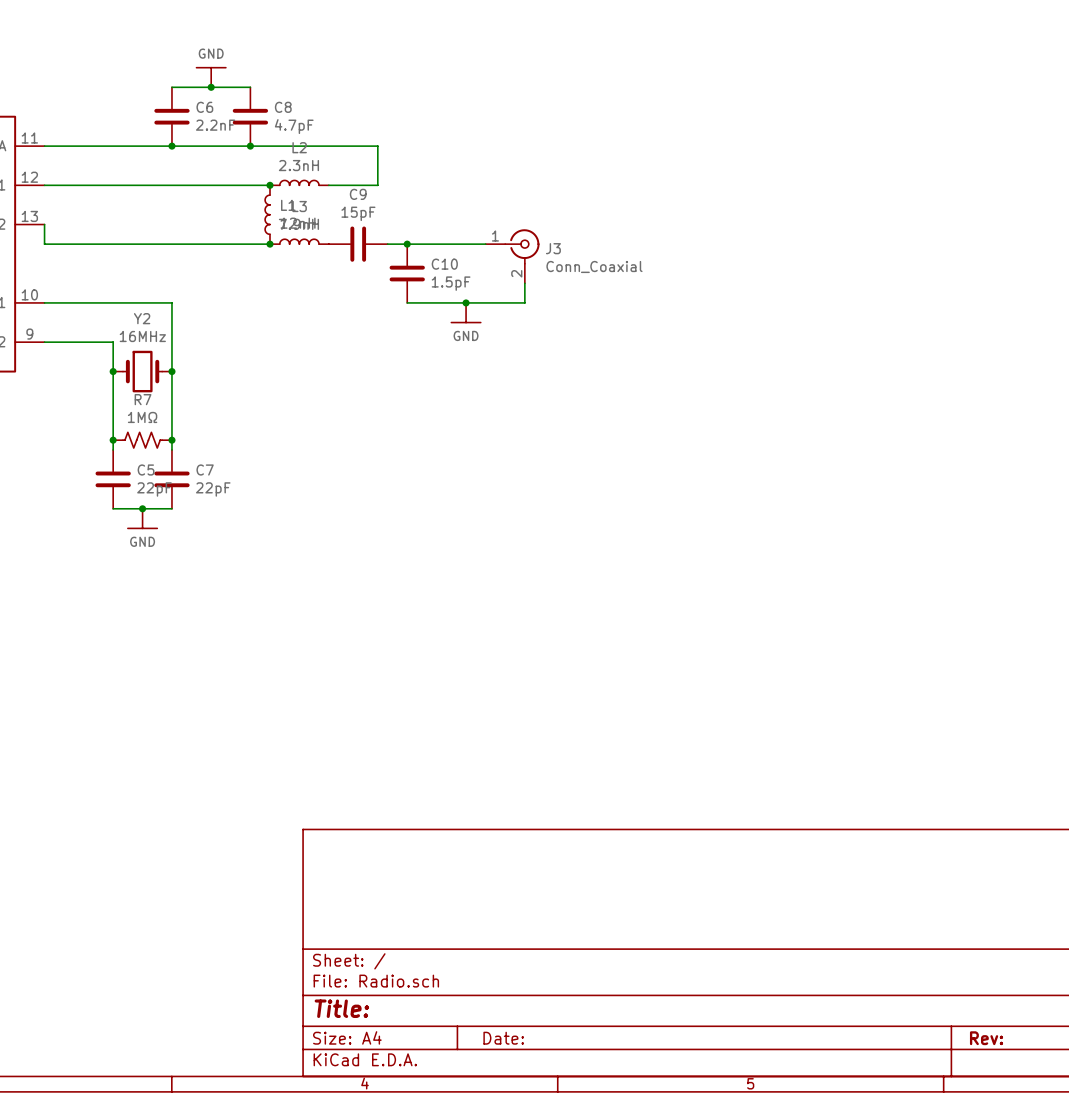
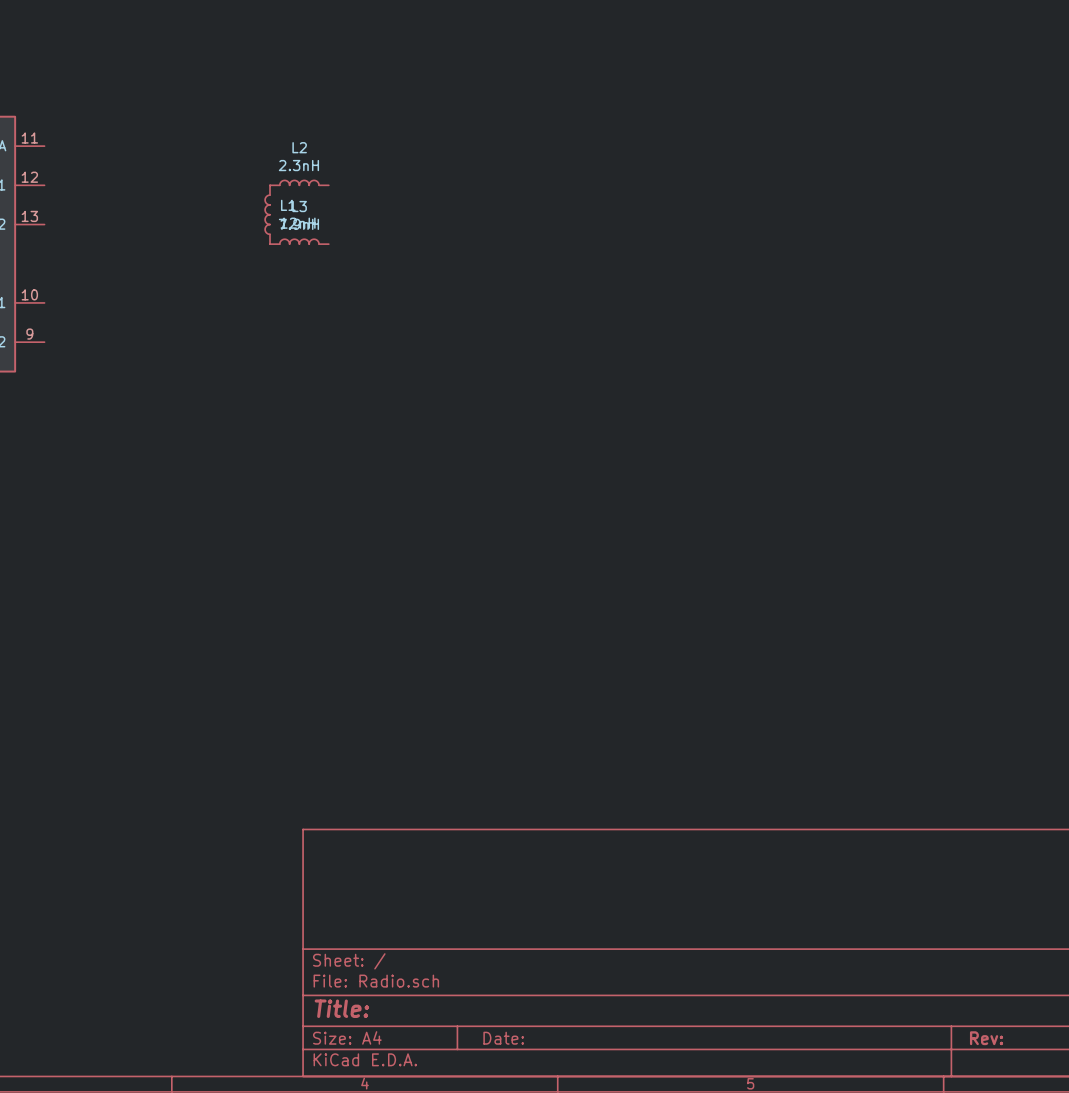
power symbol: GND (211, 77) -> none
wire: (171, 87) (250, 87) -> none
junction: (211, 87) -> none
C6: 2.2nF (171, 116) -> none
C8: 4.7pF (250, 116) -> none
wire: (44, 146) (377, 146) (377, 185) (328, 185) -> none
junction: (171, 146) -> none
junction: (250, 146) -> none
wire: (44, 185) (270, 185) -> none
junction: (270, 185) -> none
wire: (44, 224) (44, 244) (270, 244) -> none
junction: (270, 244) -> none
C9: 15pF (358, 244) -> none
wire: (387, 244) (485, 244) -> none
junction: (407, 244) -> none
J3: Conn_Coaxial (512, 256) -> none
C10: 1.5pF (407, 273) -> none
wire: (524, 283) (524, 302) (407, 302) -> none
wire: (44, 302) (171, 302) (171, 449) -> none
junction: (466, 302) -> none
power symbol: GND (466, 312) -> none
wire: (44, 342) (113, 342) (113, 449) -> none
junction: (113, 371) -> none
Y2: 16MHz (142, 371) -> none
junction: (171, 371) -> none
junction: (113, 440) -> none
R7: 1MΩ (142, 440) -> none
junction: (171, 440) -> none
C5: 22pF (113, 479) -> none
C7: 22pF (171, 479) -> none
wire: (113, 508) (171, 508) -> none
junction: (142, 508) -> none
power symbol: GND (142, 518) -> none

